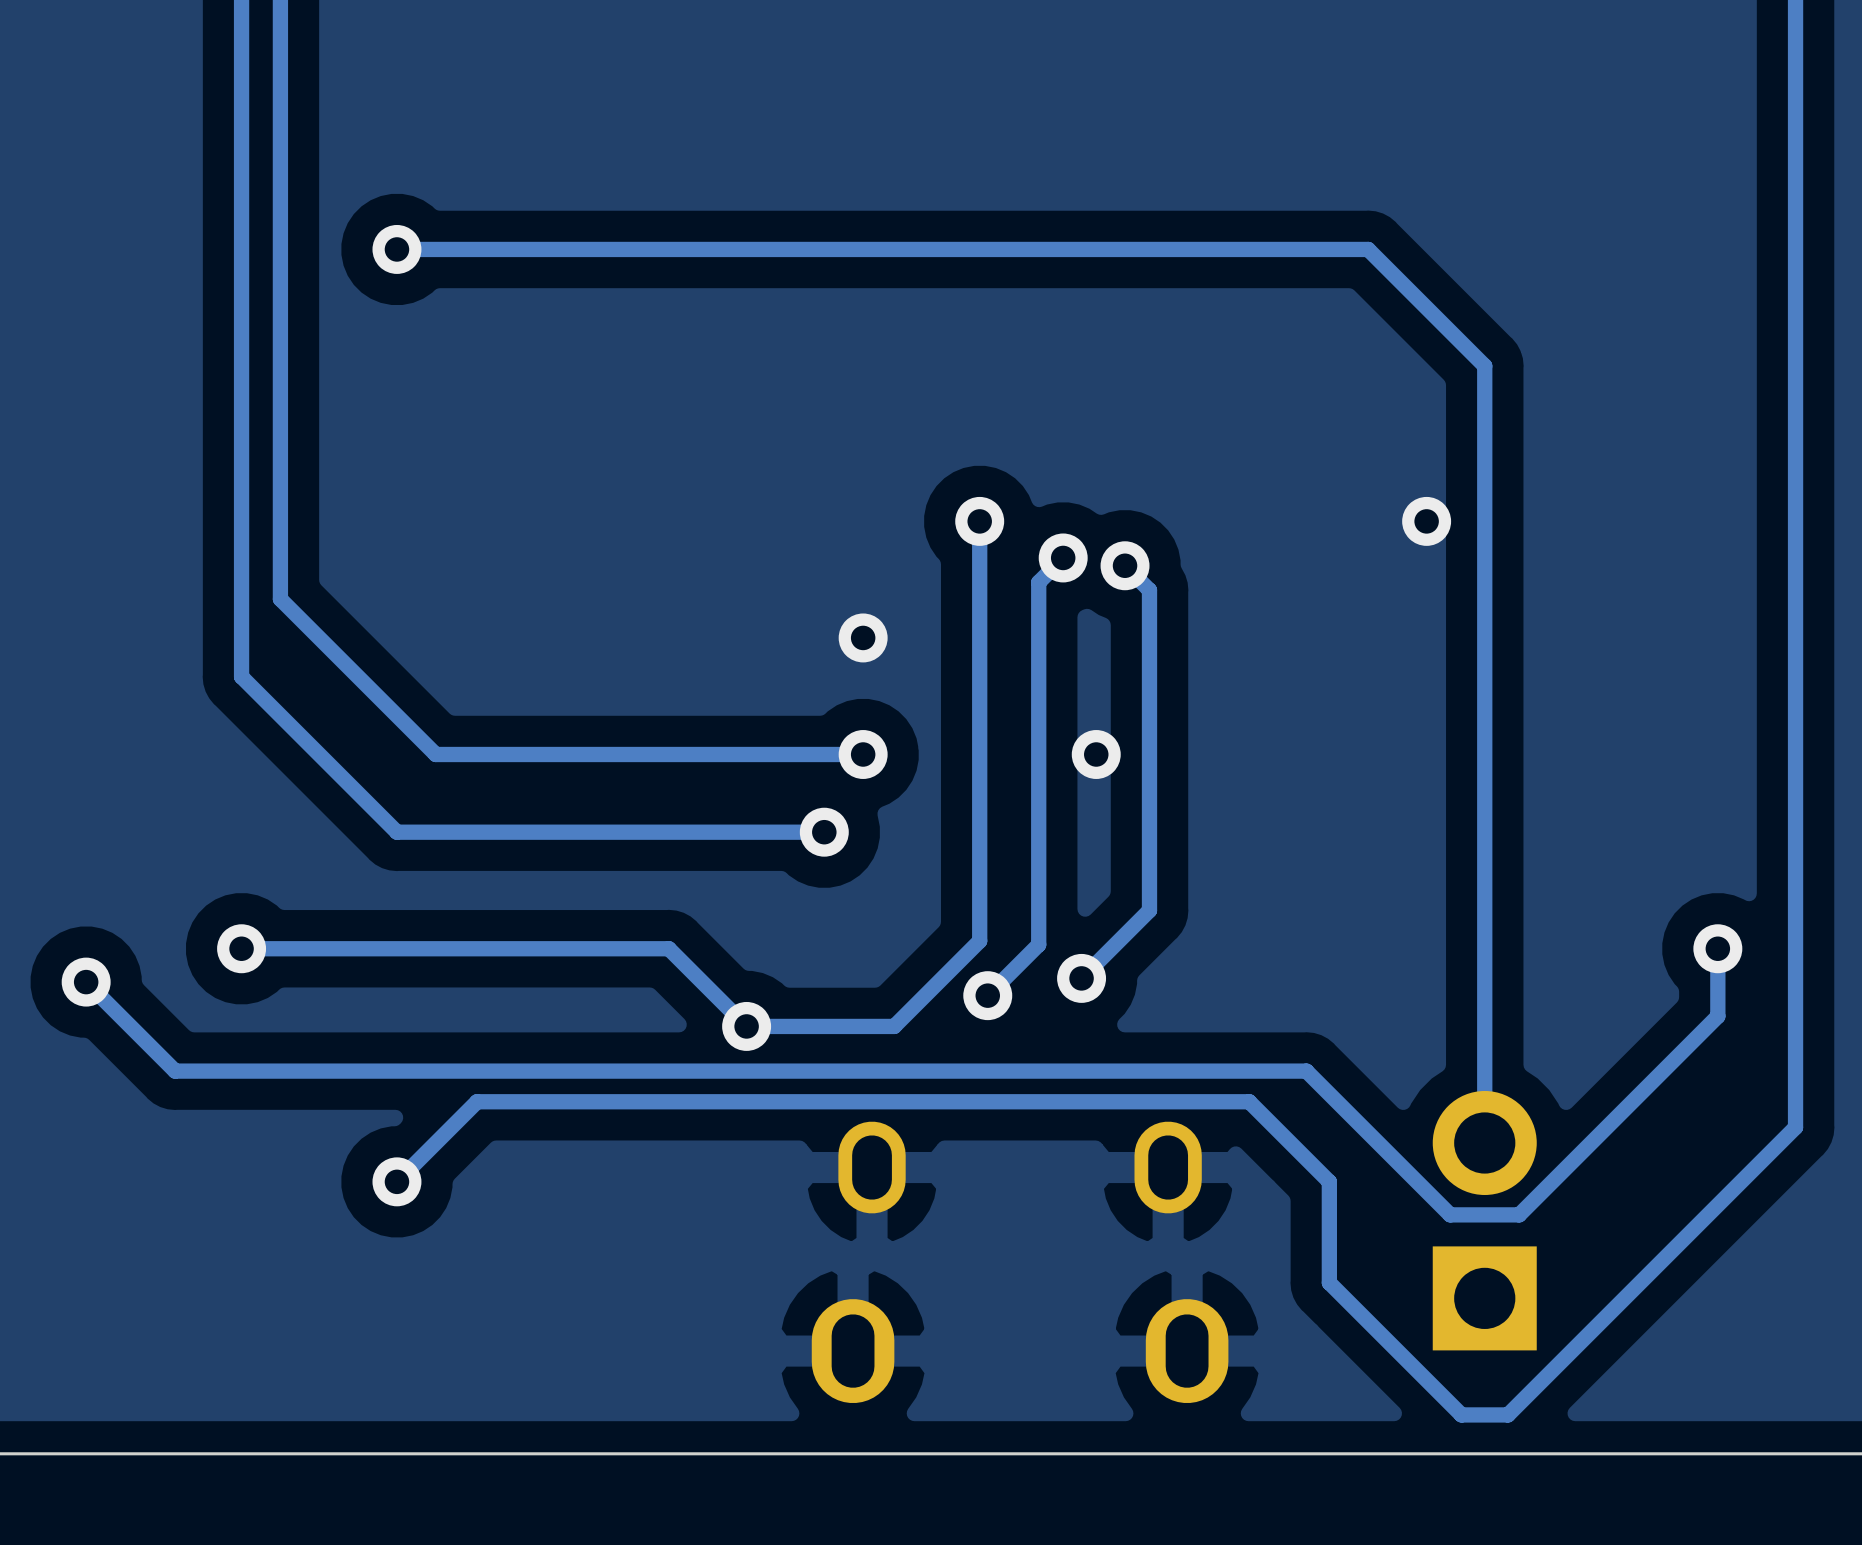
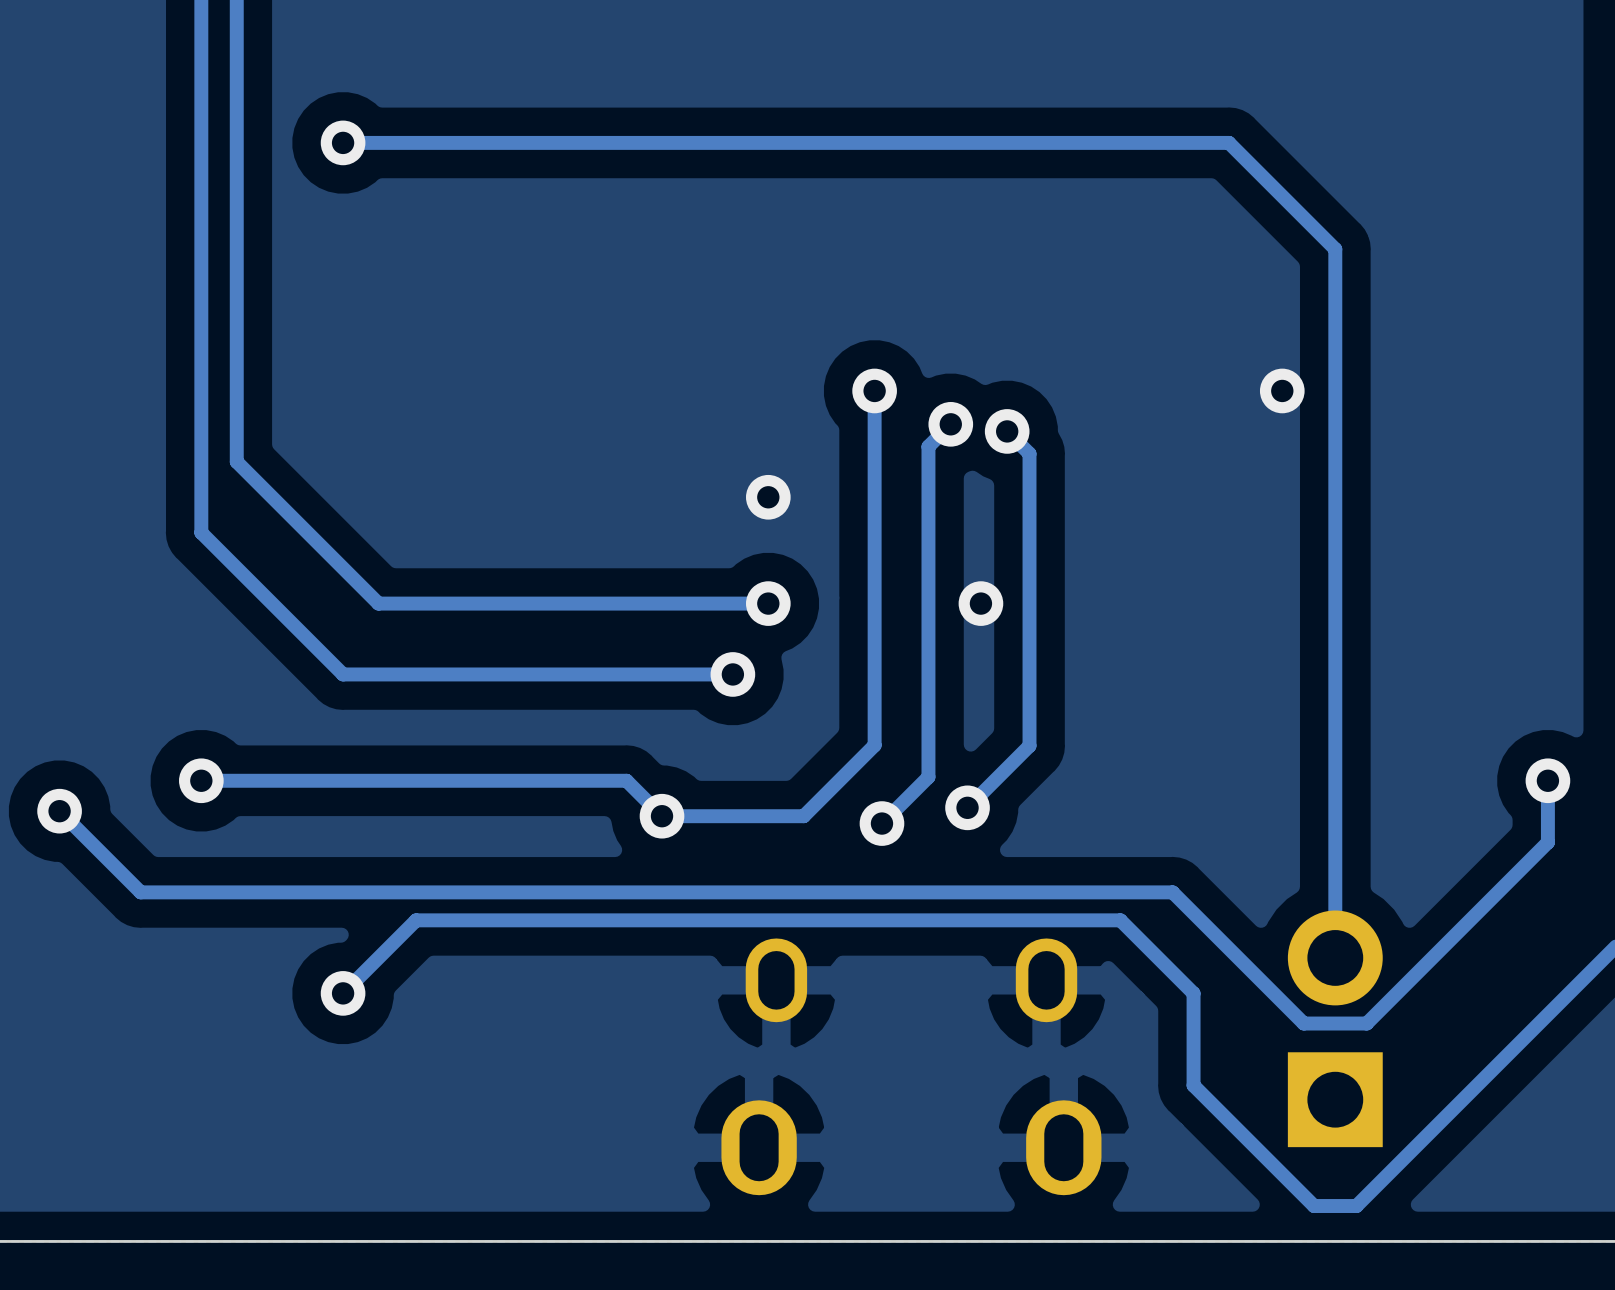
track: (979, 909) (979, 940) (894, 1026) (746, 1026) (668, 948) -> (874, 745) (803, 816) (662, 816) (626, 780) (591, 780)
via position: (746, 1026) -> (662, 816)

